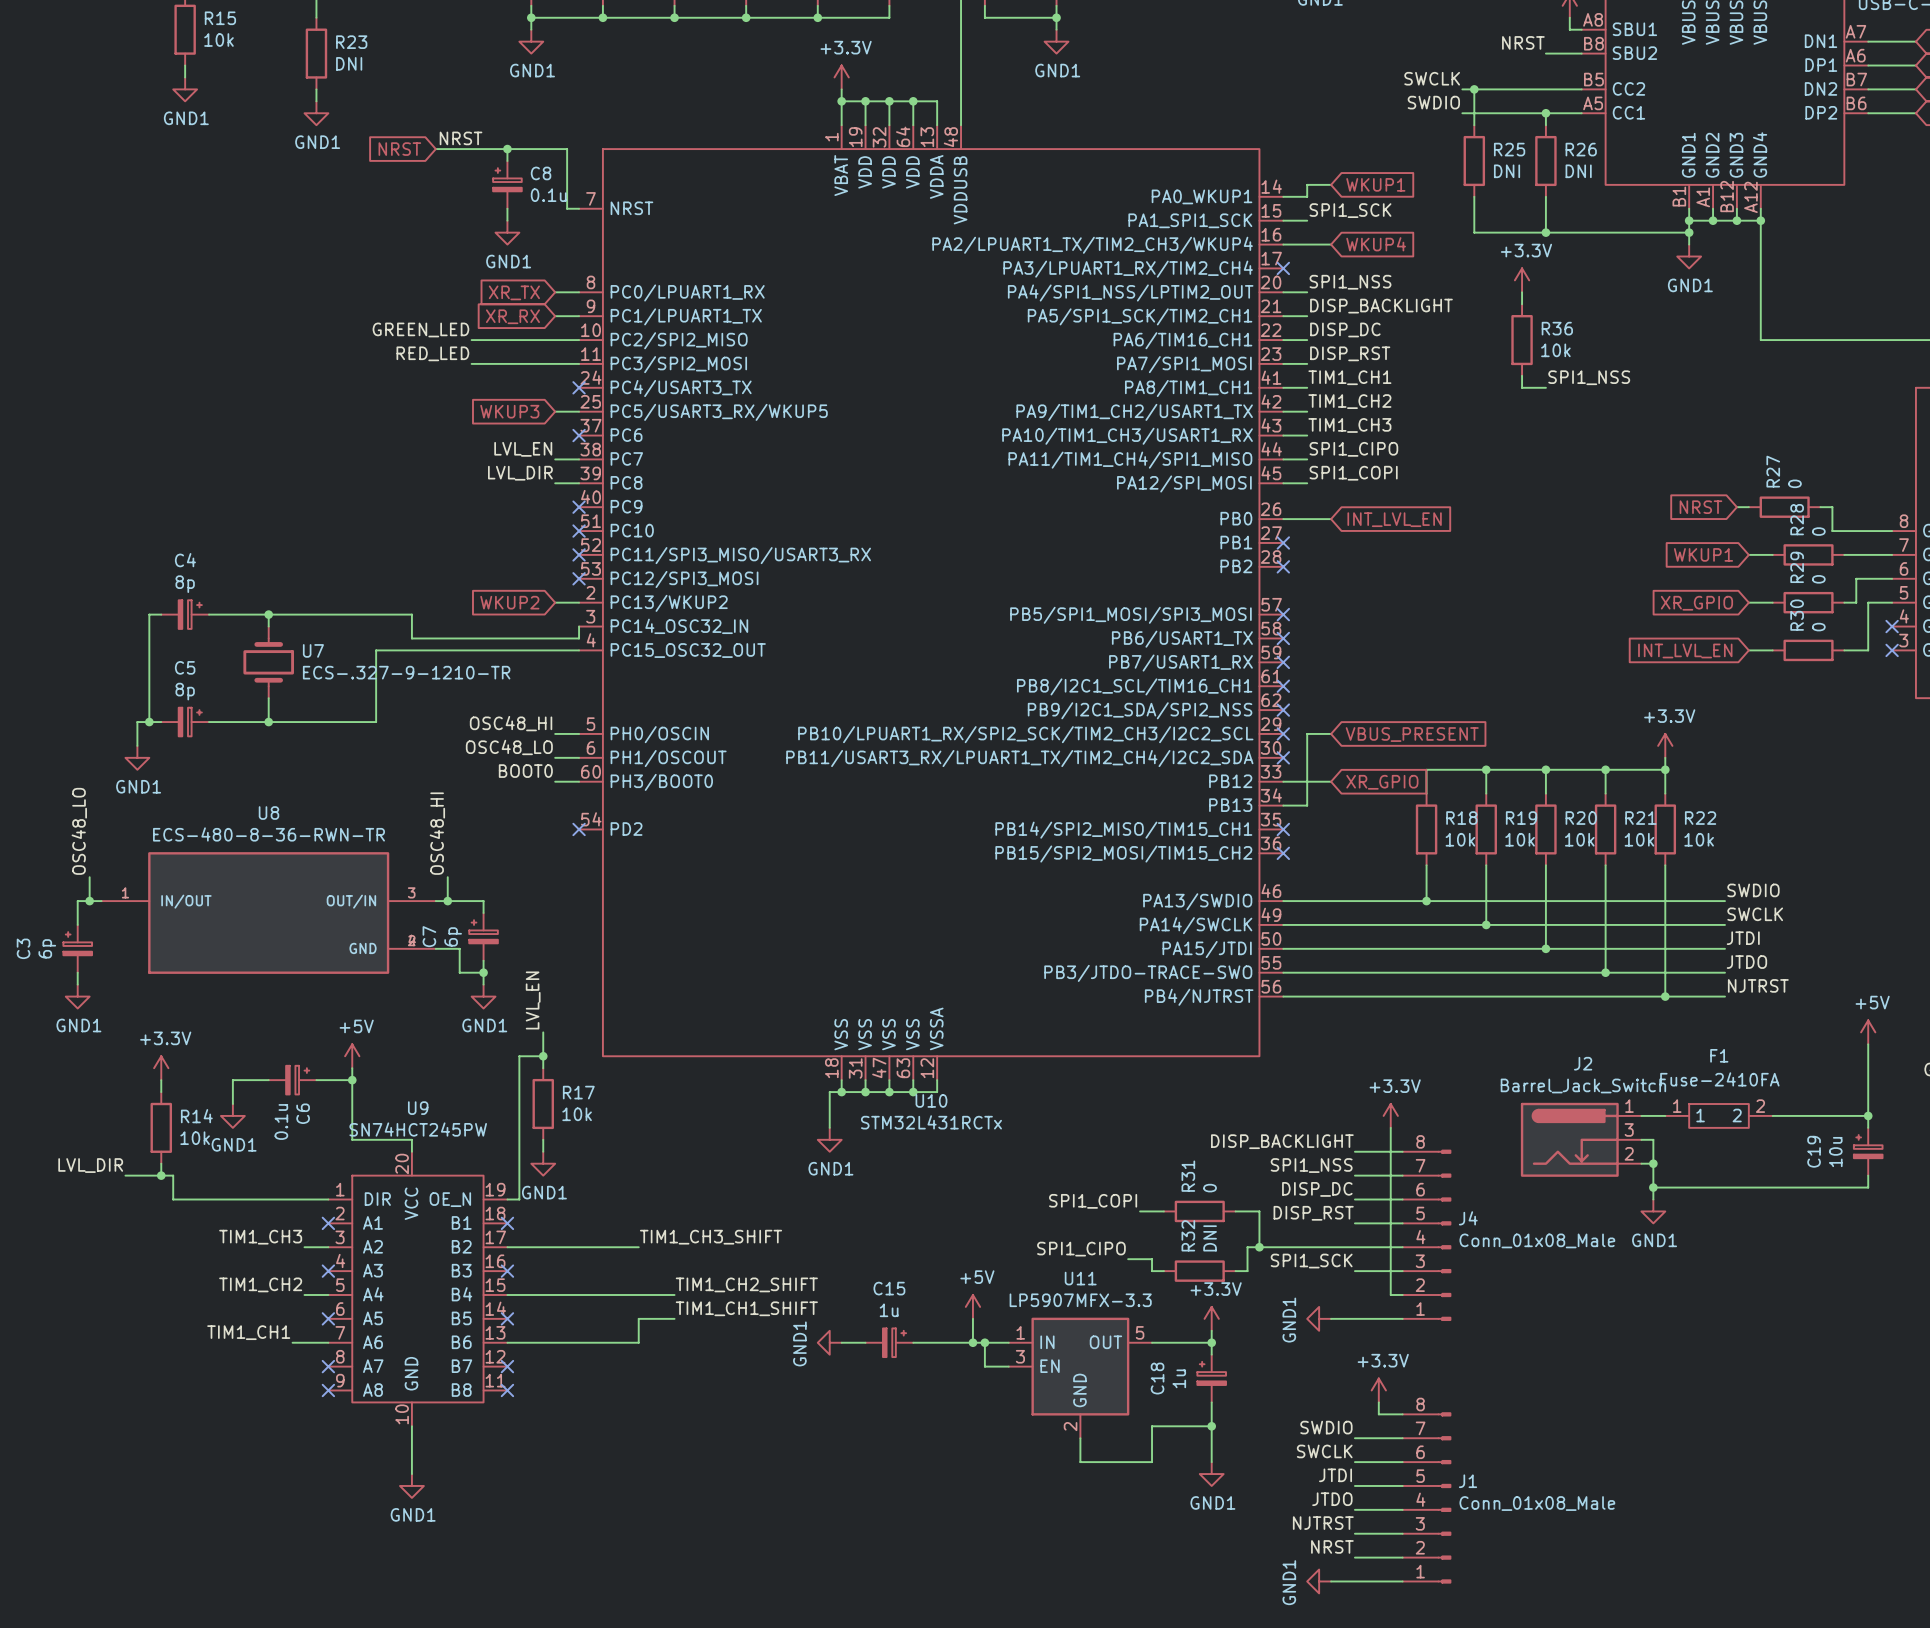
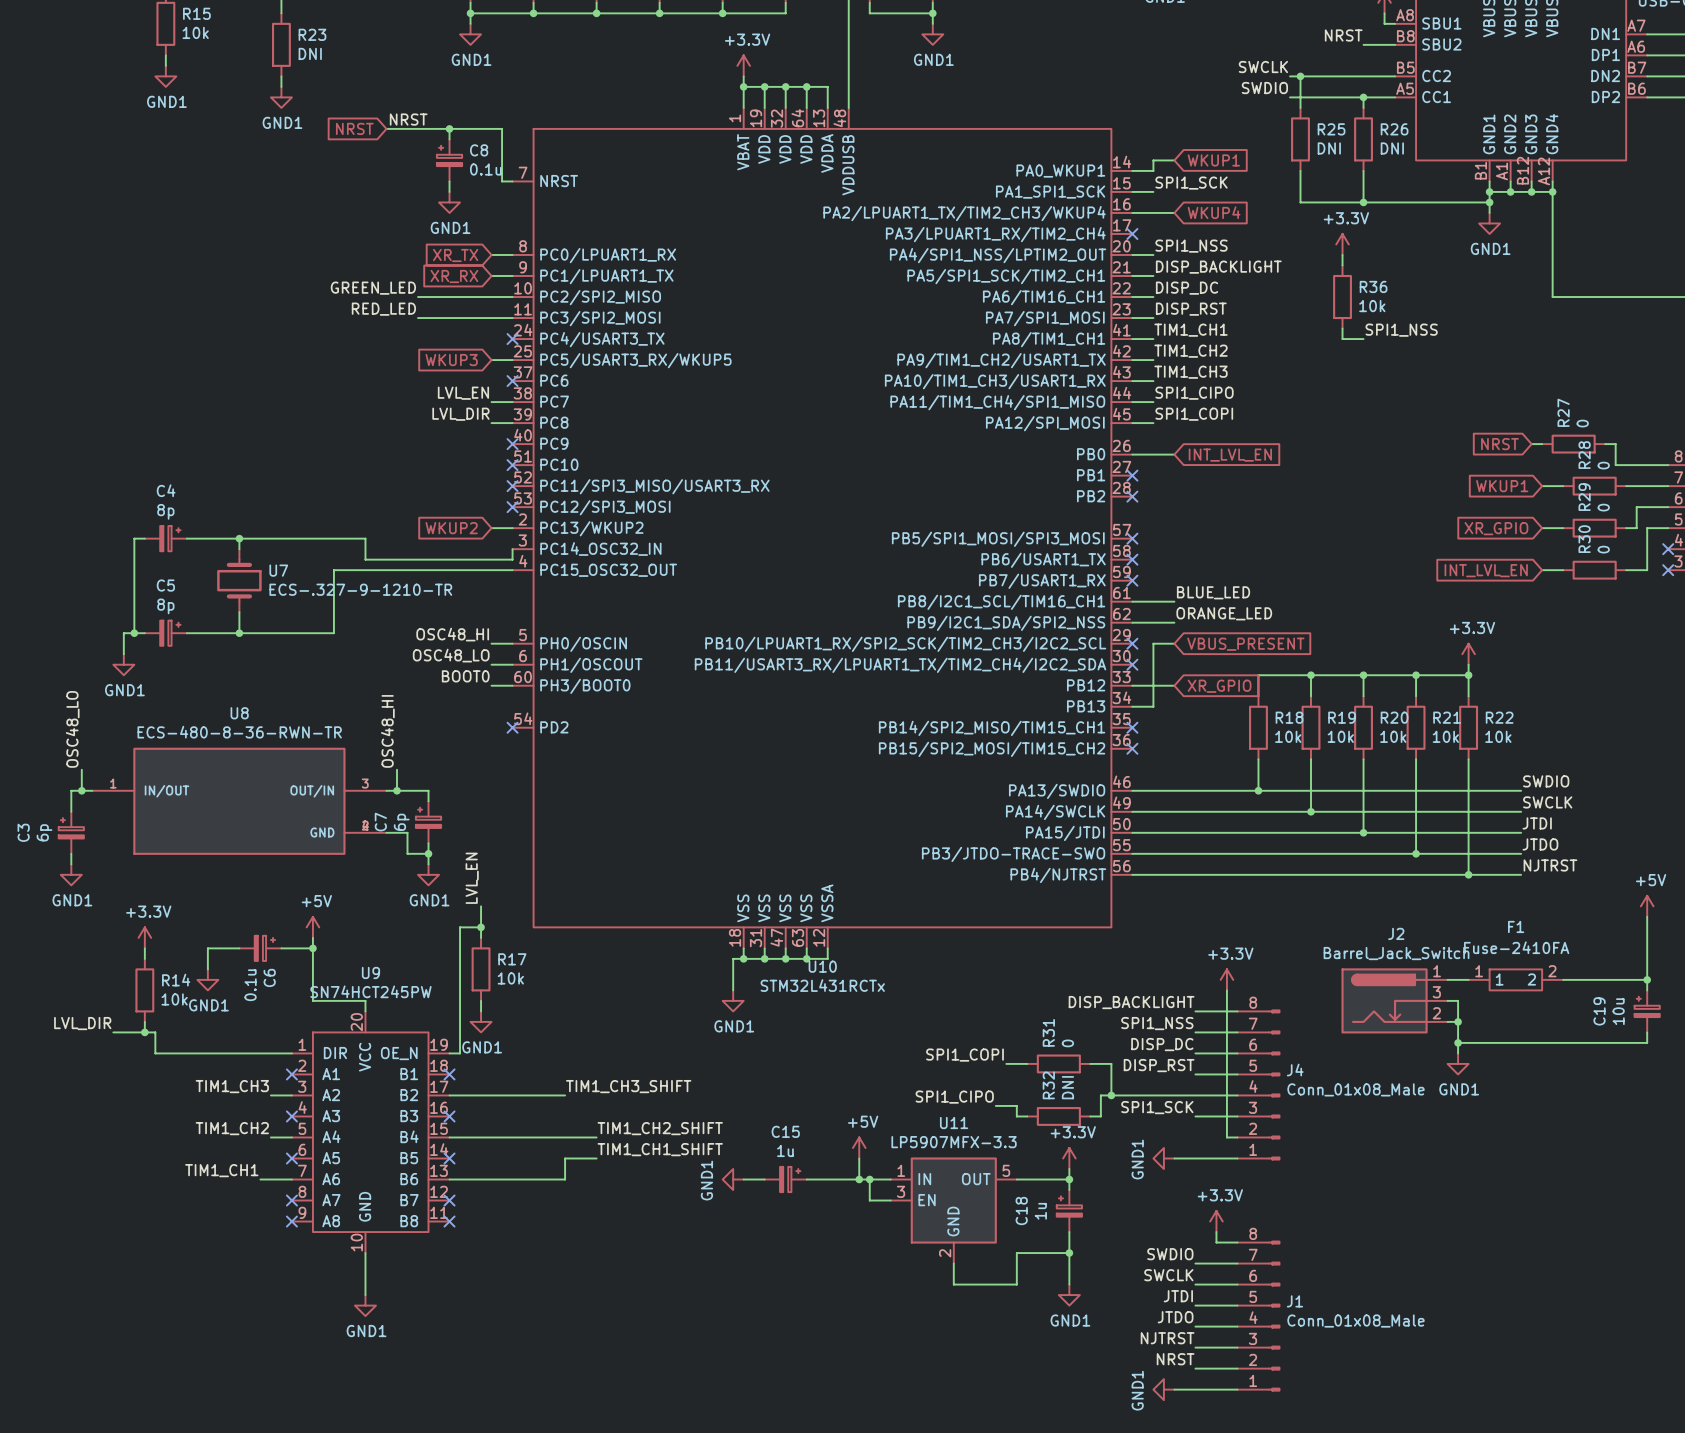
label: none -> BLUE_LED (1213, 592)
wire: none -> (1132, 601) (1174, 601)
no-connect mark: (1283, 686) -> none
label: none -> ORANGE_LED (1224, 613)
wire: none -> (1132, 622) (1174, 622)
no-connect mark: (1283, 710) -> none

